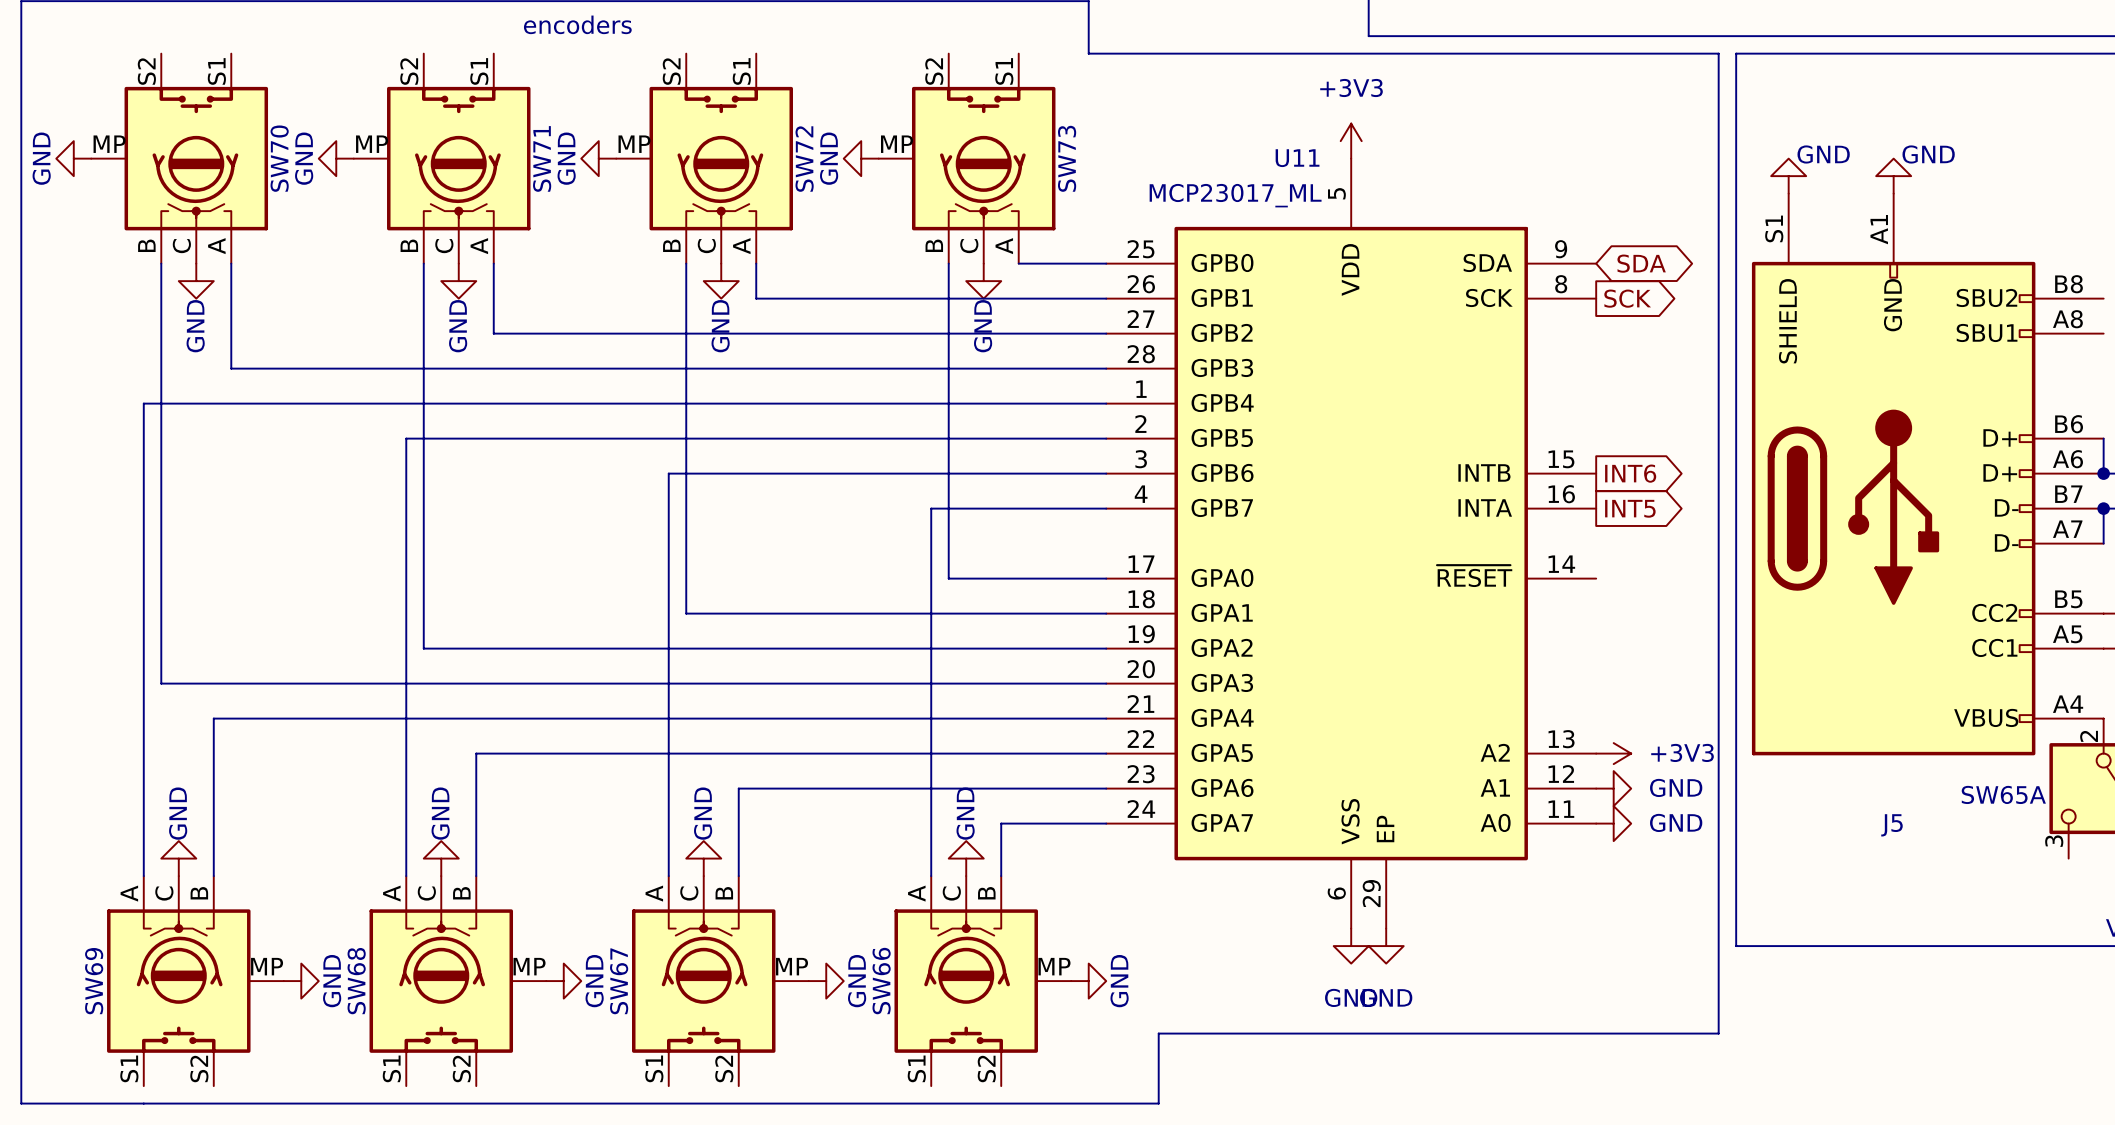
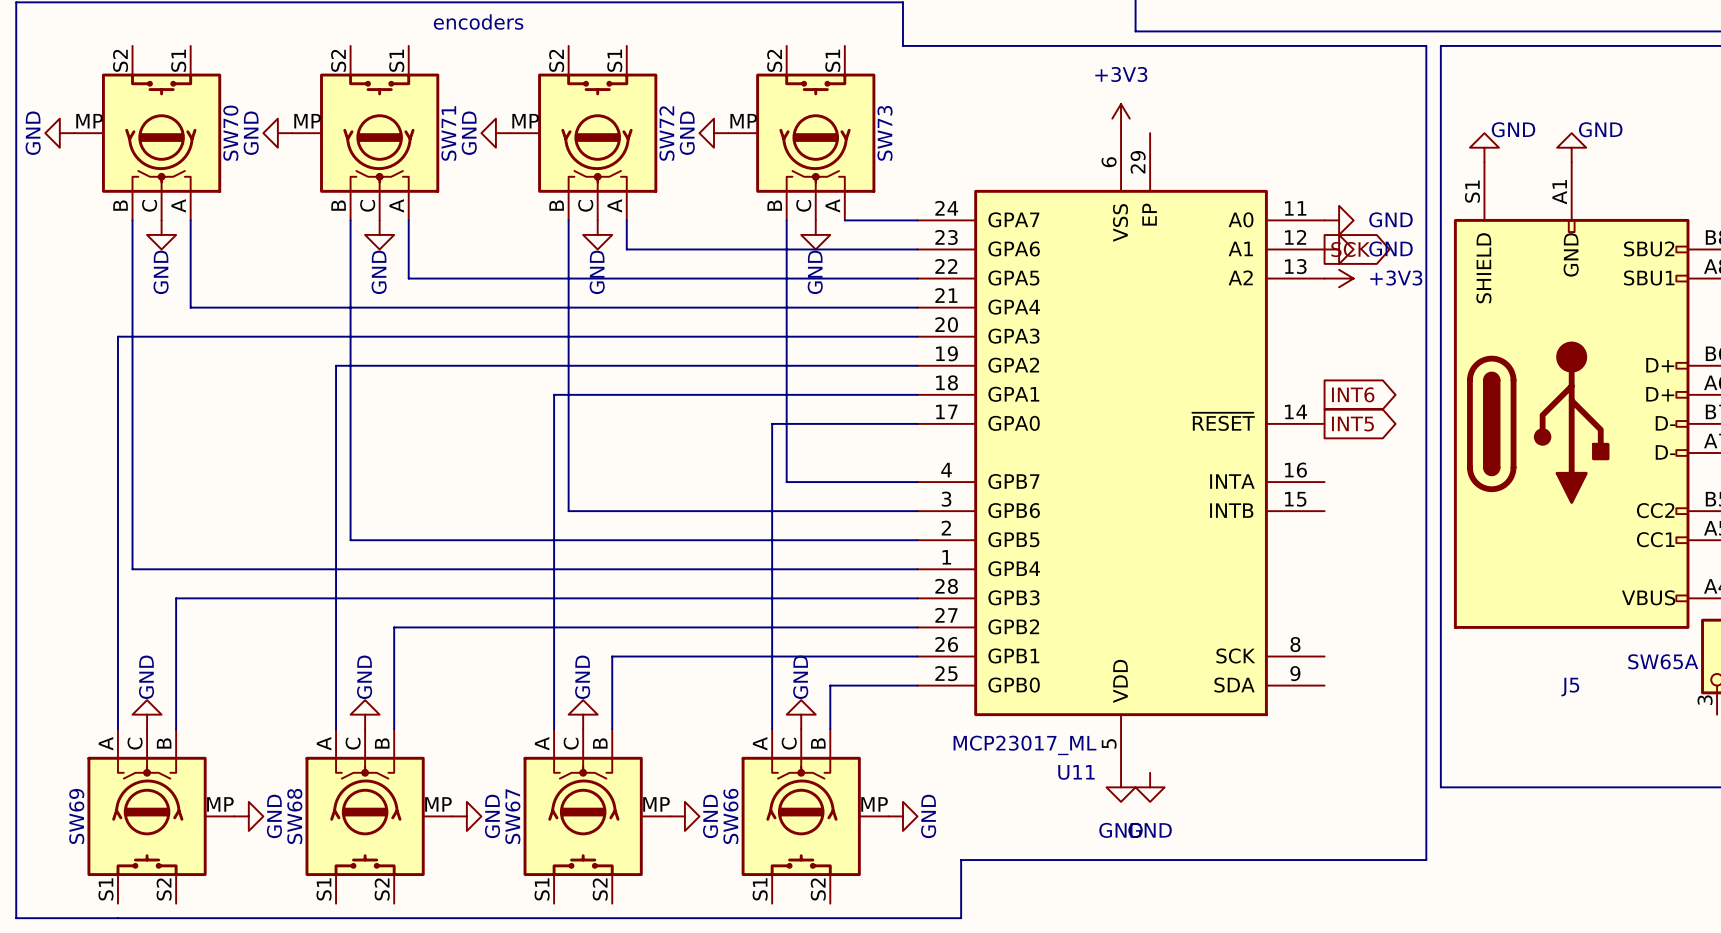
power symbol: none -> GND (1339, 220)
global label: SDA (1641, 263) -> none
power symbol: none -> GND (1339, 249)
power symbol: none -> +3V3 (1339, 278)
U11 flip: as is (1351, 543) -> up-down (1121, 452)
power symbol: +3V3 (1613, 753) -> none
power symbol: GND (1613, 788) -> none
power symbol: GND (1613, 823) -> none

